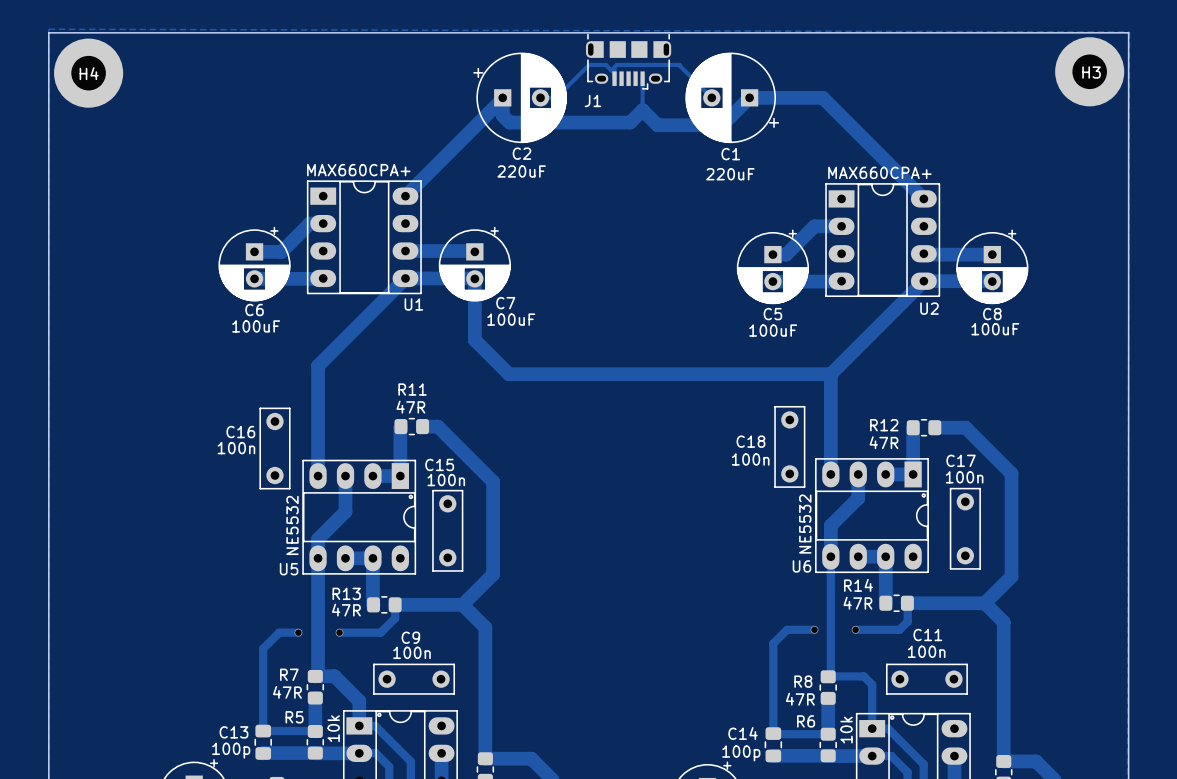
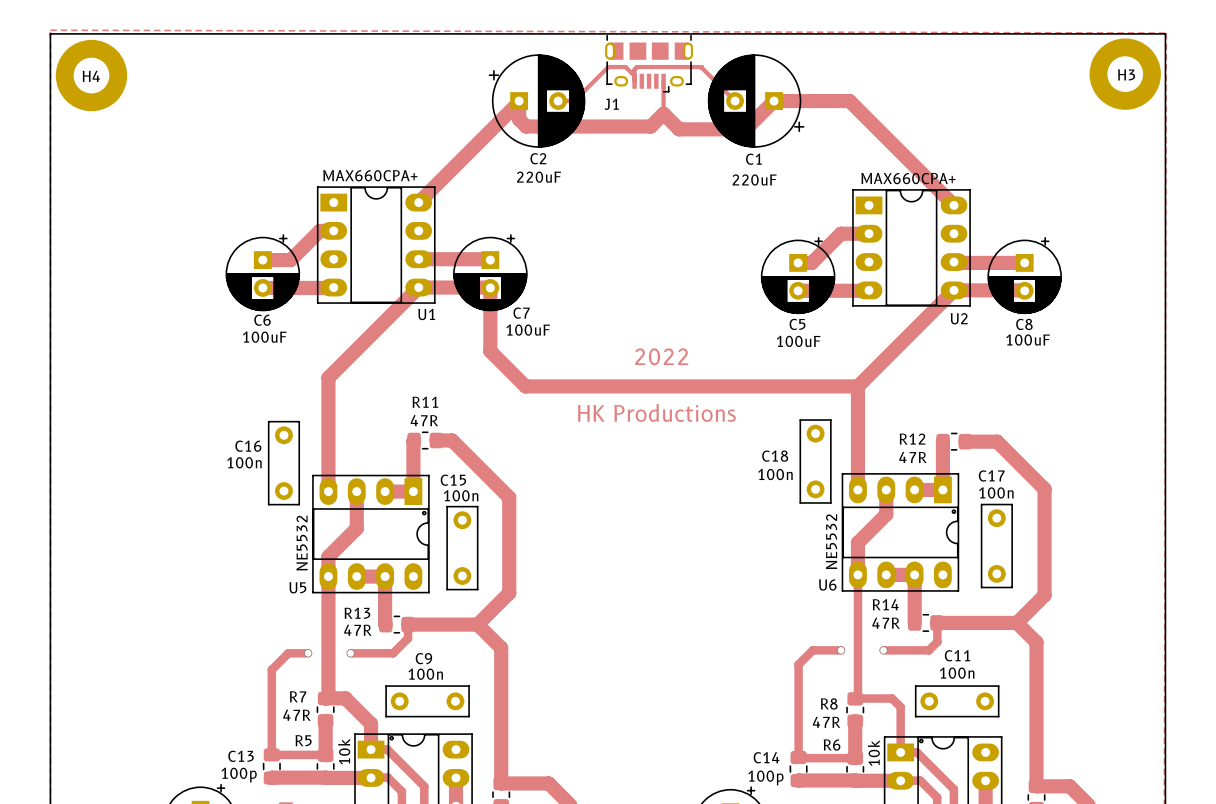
text: none -> 2022 (661, 356)
text: none -> HK Productions (656, 412)

